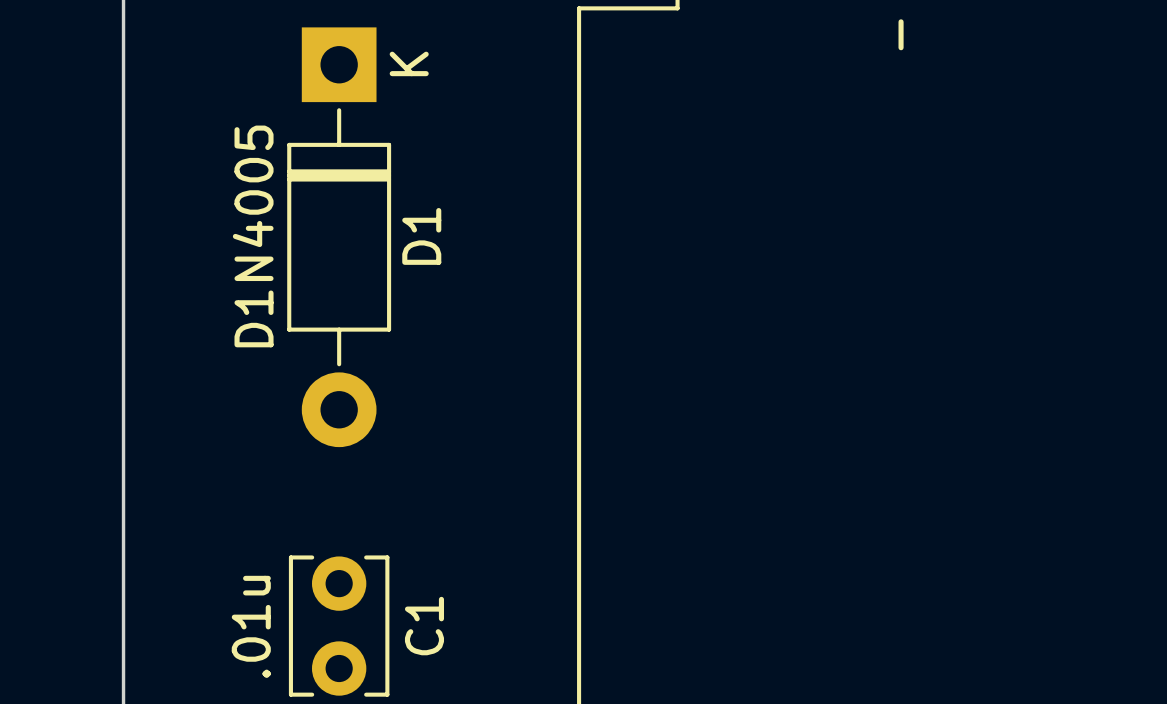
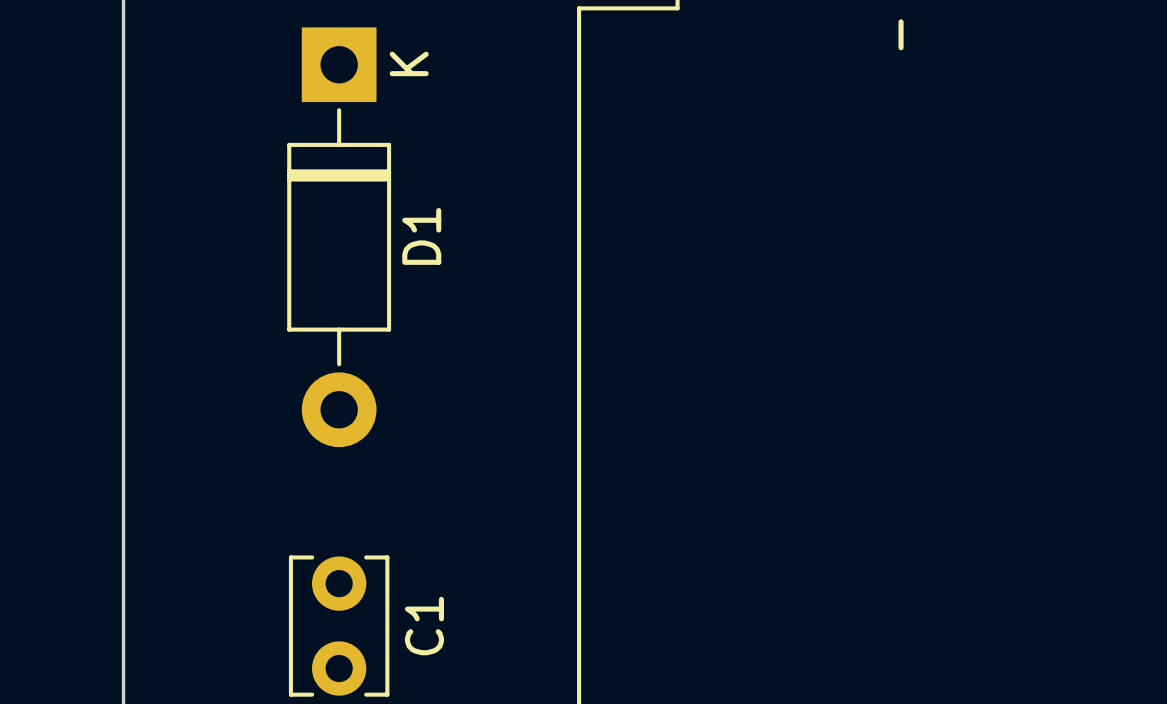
D1 value: D1N4005 (253, 236) -> none
C1 value: .01u (251, 626) -> none

